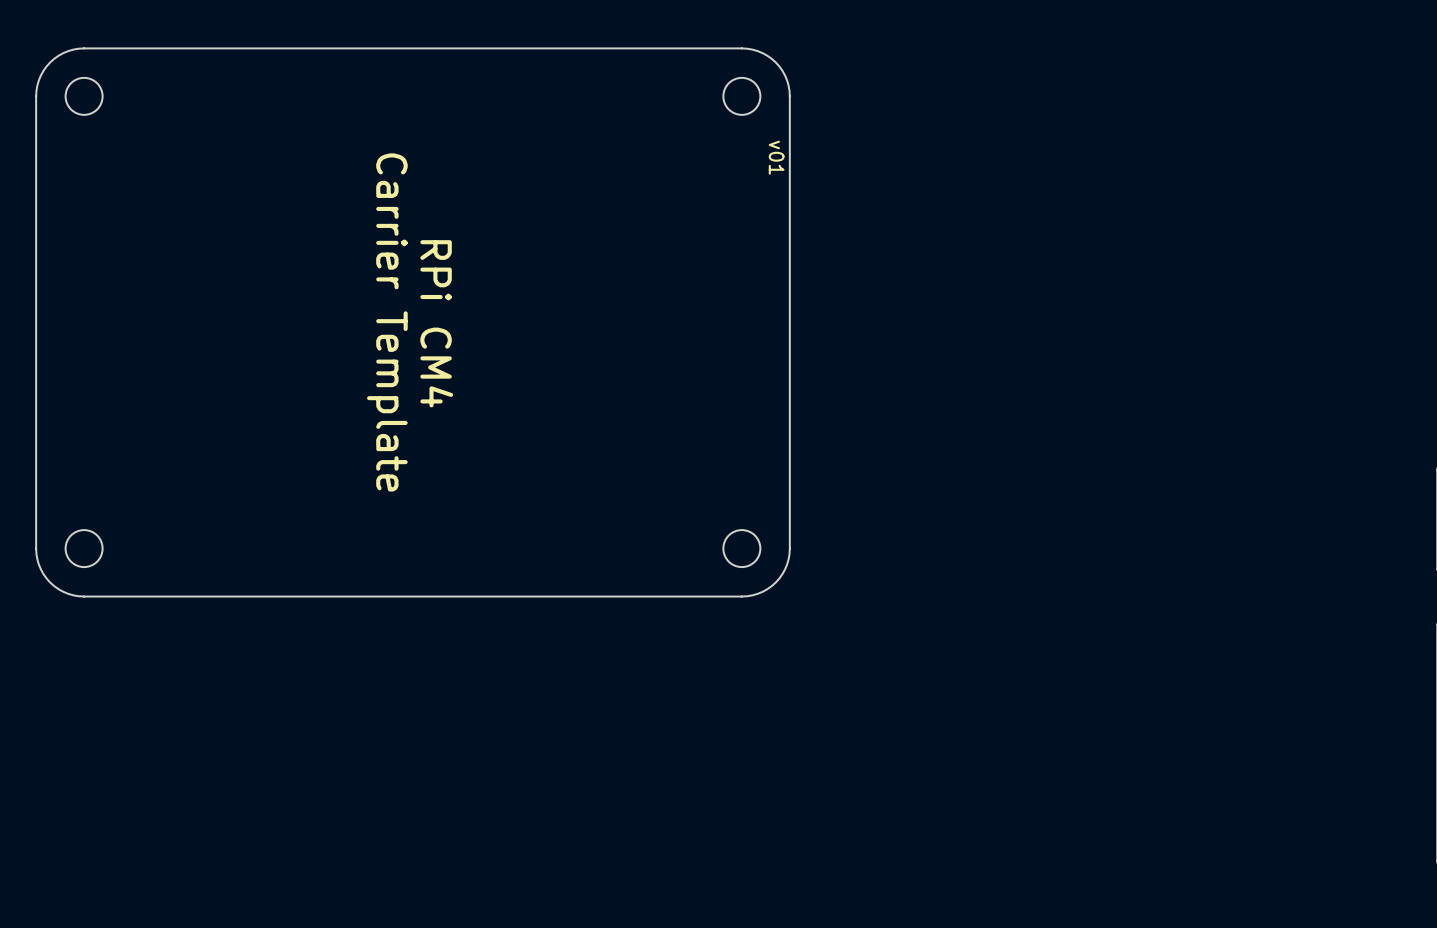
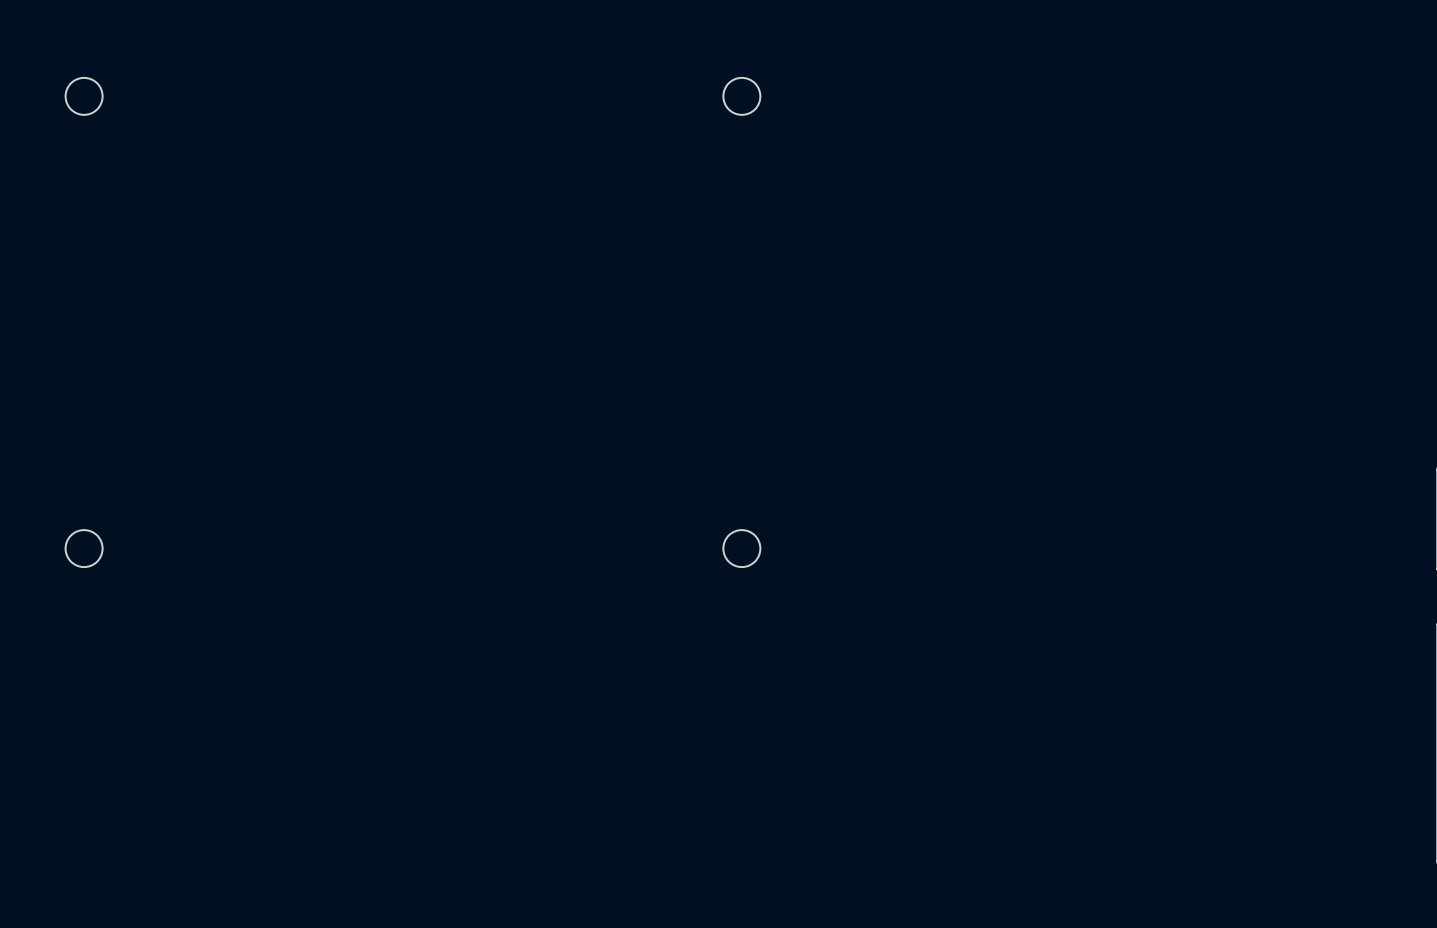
board edge: (741, 48) (84, 48) (68, 51) (54, 58) (40, 75) (36, 96) (36, 548) (38, 564) (46, 578) (63, 591) (84, 596) (741, 596) (757, 593) (771, 586) (785, 569) (789, 548) (789, 96) (785, 75) (775, 62) (757, 51) (741, 48) -> none
text: v01 (776, 157) -> none
text: Carrier Template (387, 322) -> none
text: RPi CM4 (436, 323) -> none

